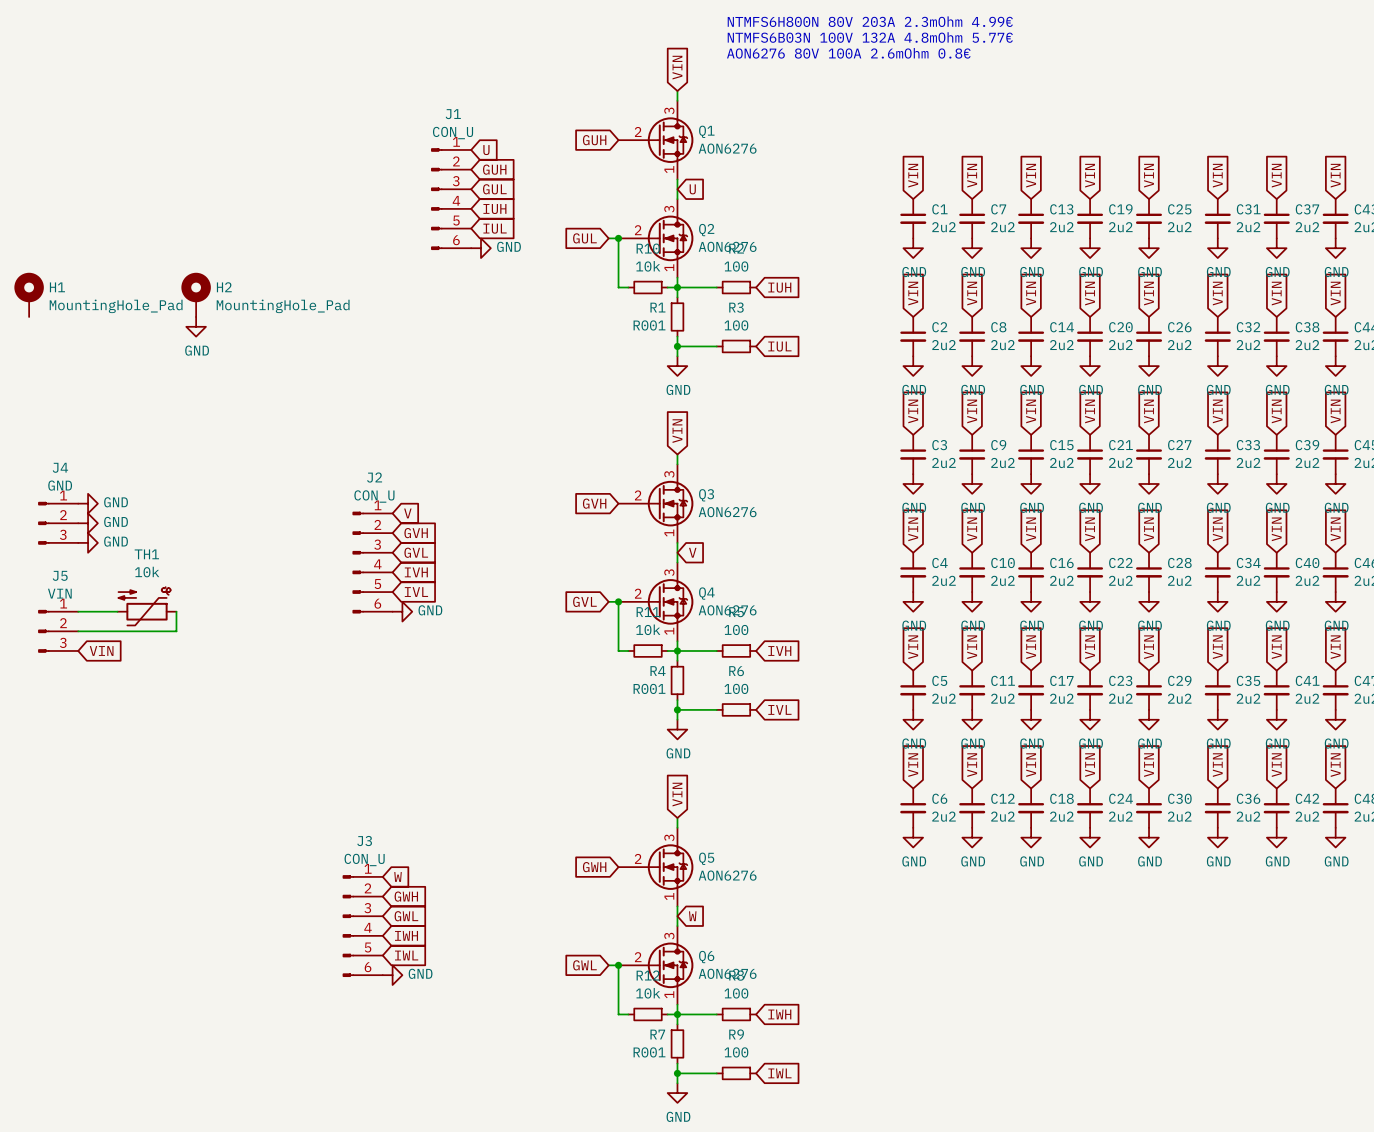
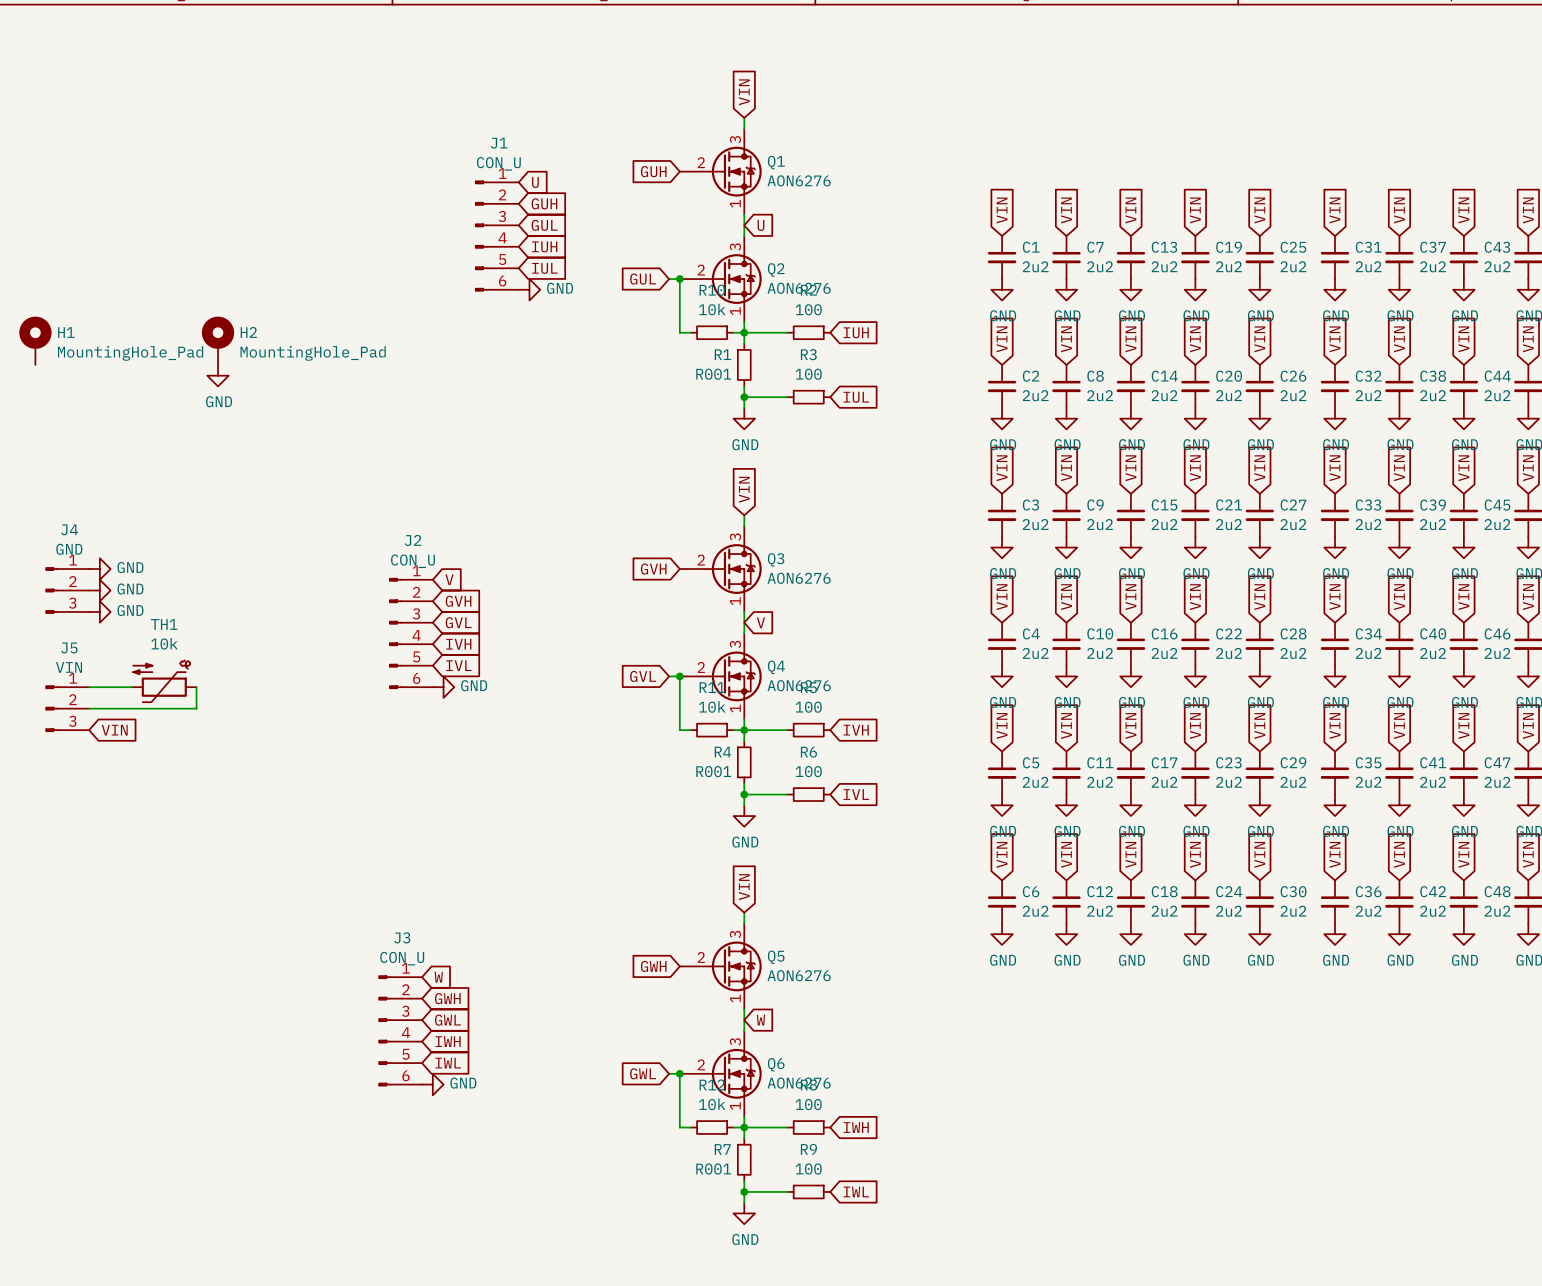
text: NTMFS6H800N 80V 203A 2.3mOhm 4.99€ (870, 21) -> none
text: NTMFS6B03N 100V 132A 4.8mOhm 5.77€ (870, 37) -> none
text: AON6276 80V 100A 2.6mOhm 0.8€ (848, 53) -> none

